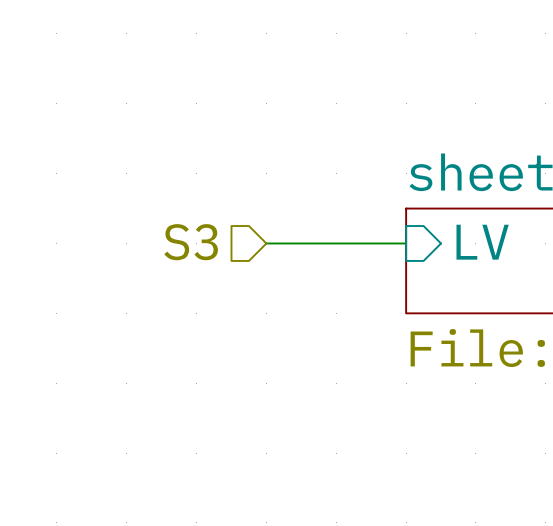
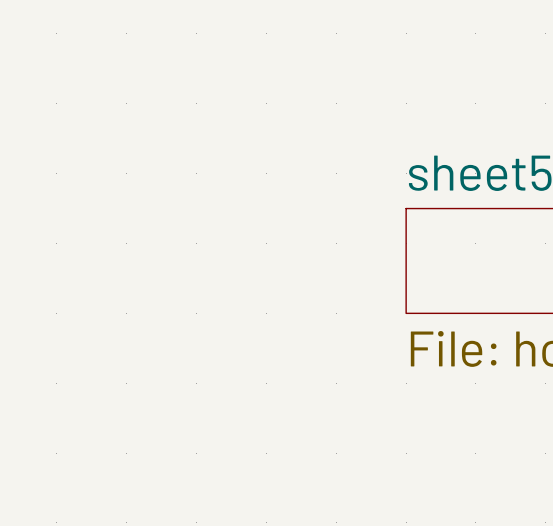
hierarchical label: S3 (191, 242) -> none
sheet pin: LV (482, 242) -> none
wire: (266, 243) (406, 243) -> none

